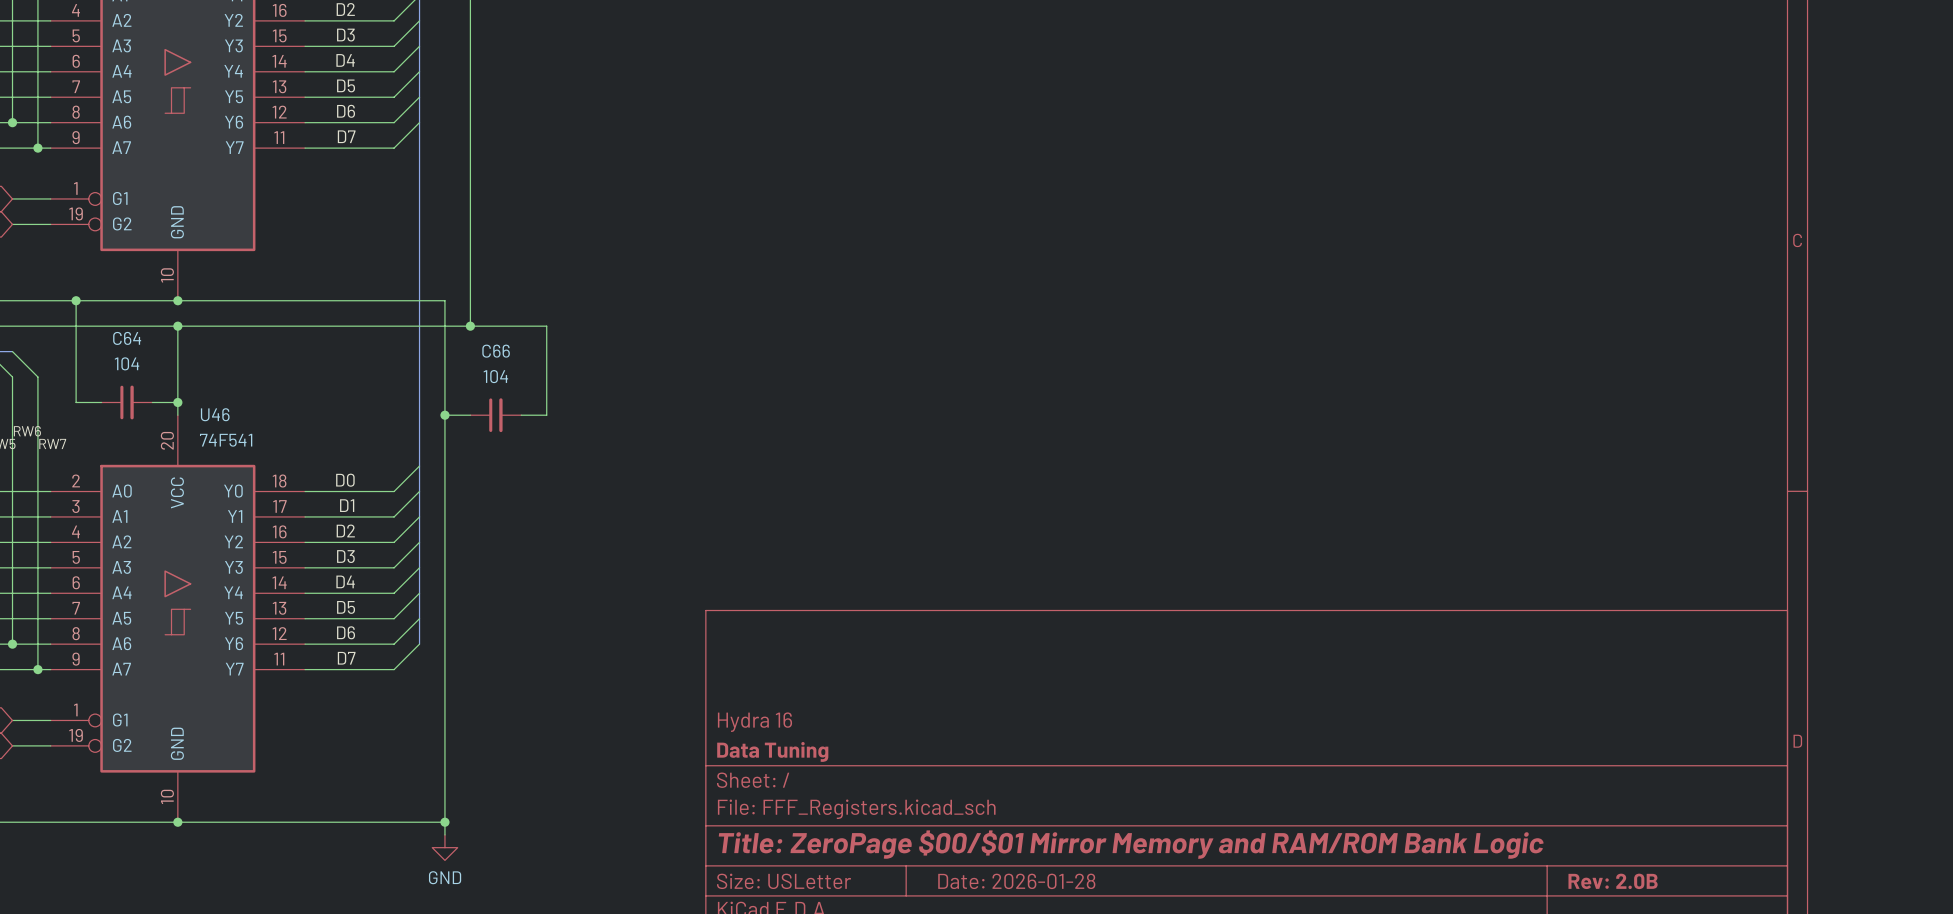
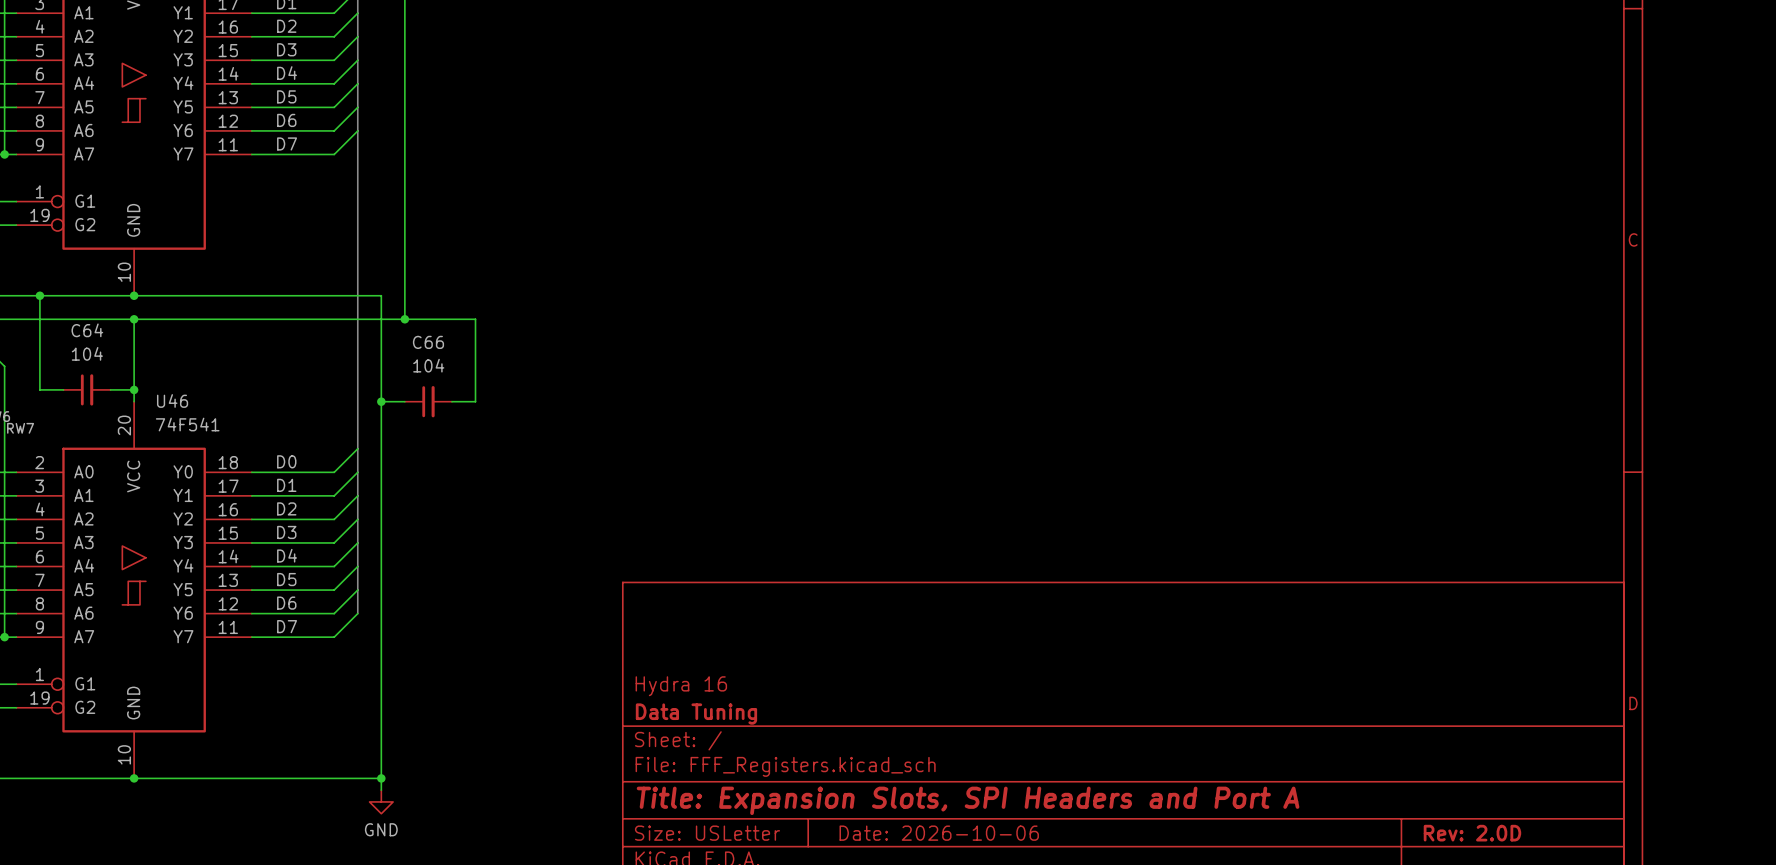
title block: Title: ZeroPage $00/$01 Mirror Memory and RAM/ROM Bank Logic (1131, 844) -> Title: Expansion Slots, SPI Headers and Port A (968, 800)
title block: Date: 2026-01-28 (1016, 881) -> Date: 2026-10-06 (939, 833)
title block: Rev: 2.0B (1613, 881) -> Rev: 2.0D (1472, 833)

